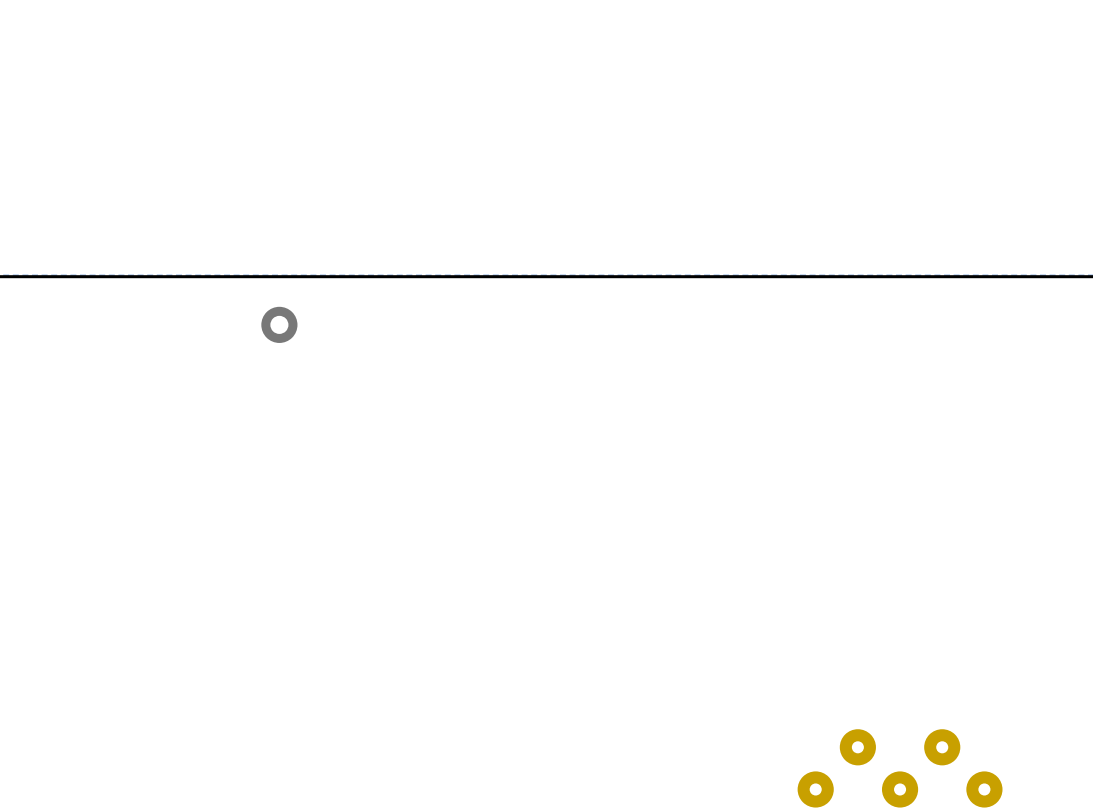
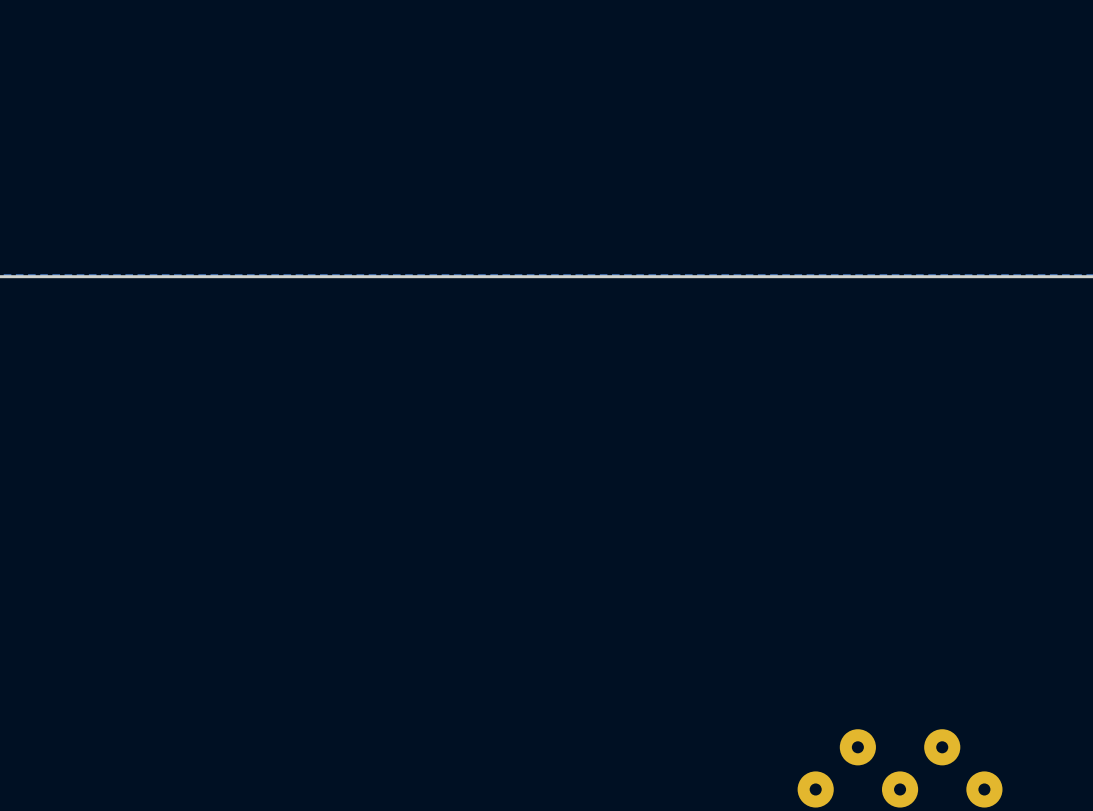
via: (279, 324) -> none

